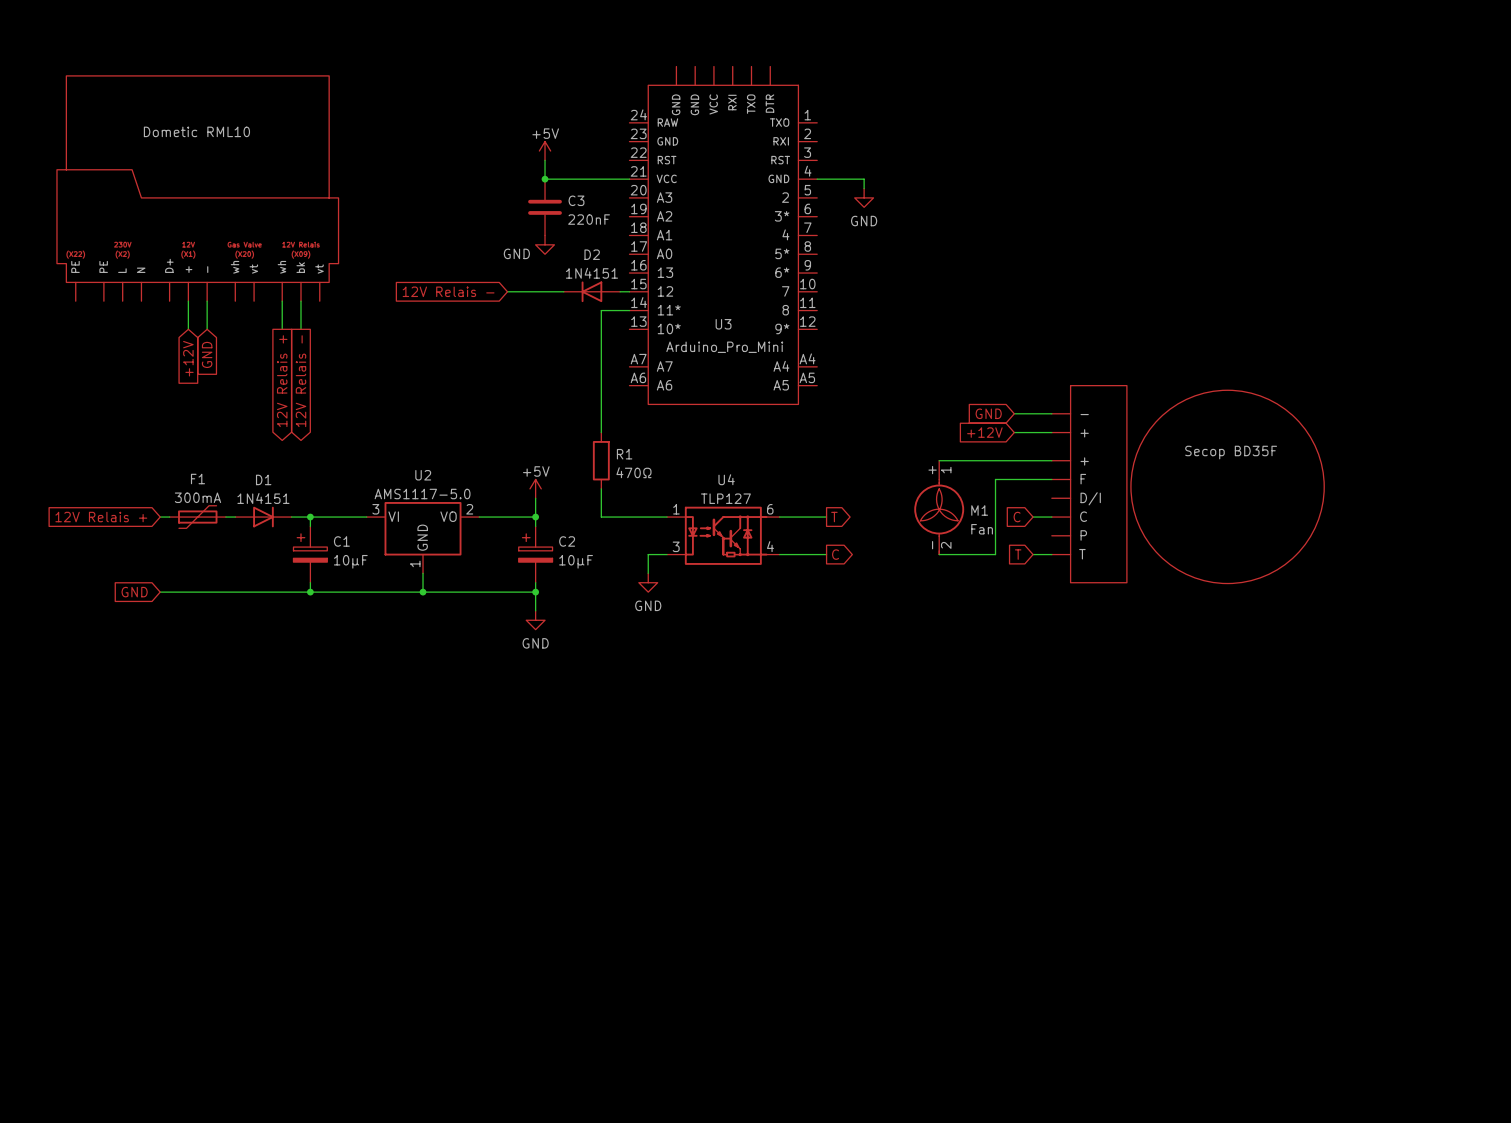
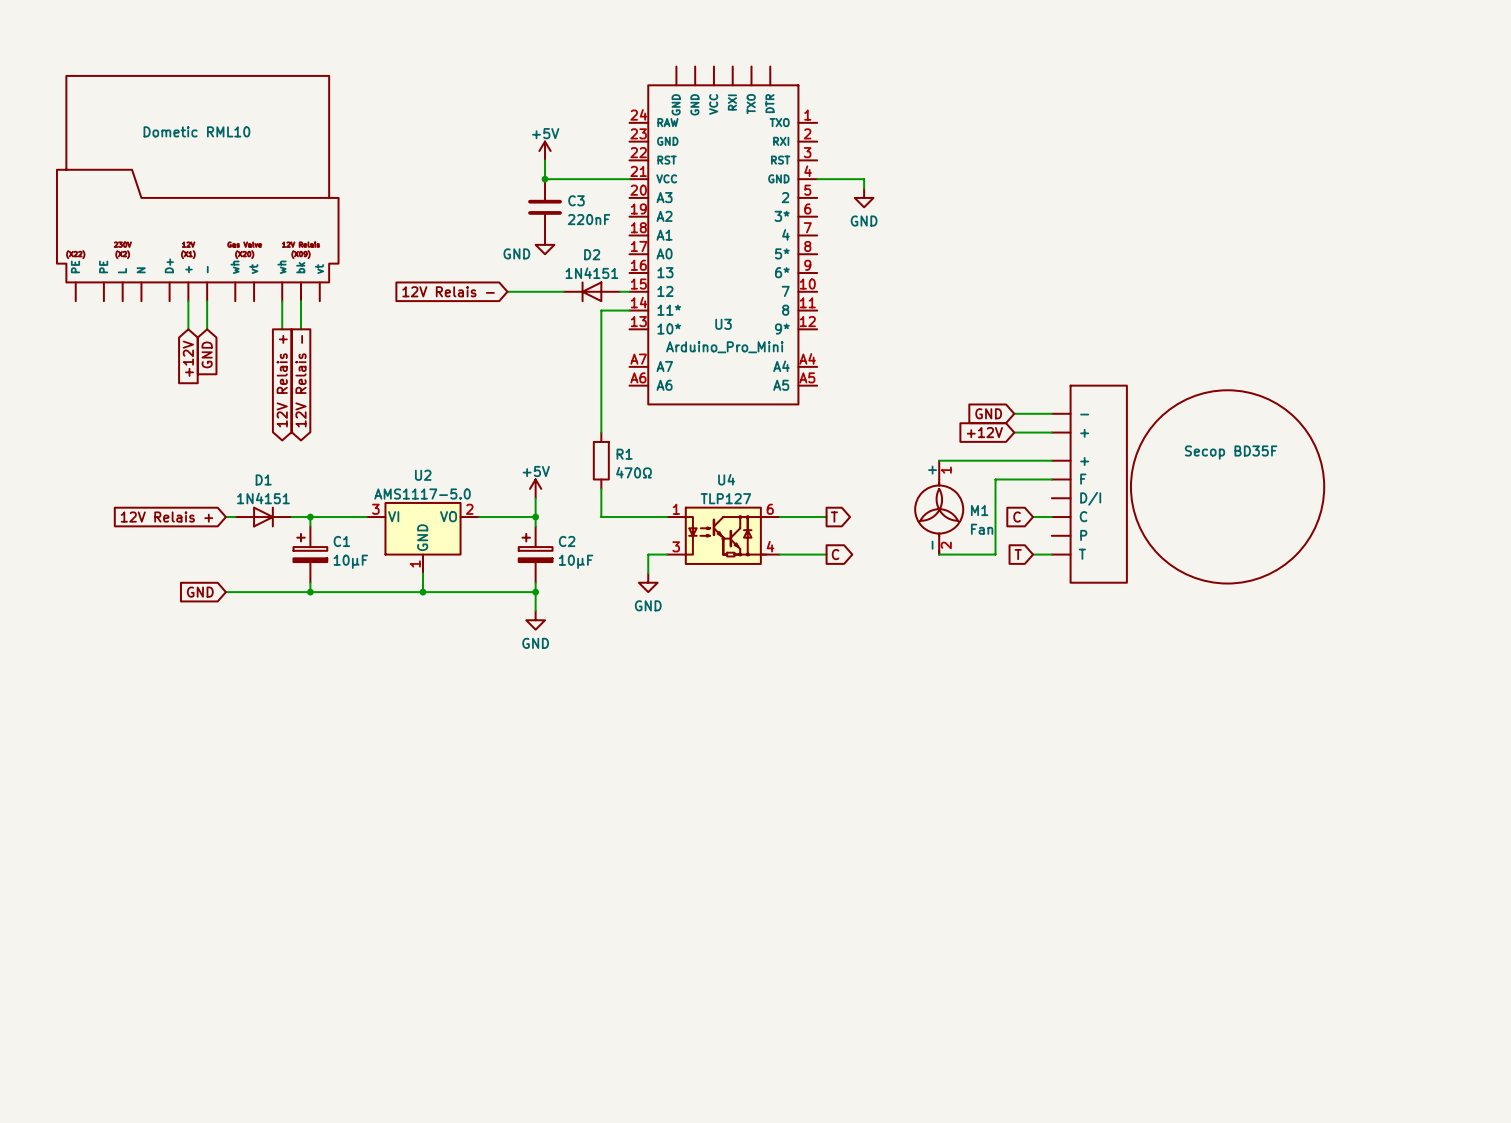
global label position: 12V Relais + (101, 517) -> 12V Relais + (167, 517)
wire: (160, 517) (169, 517) -> none
F1: 300mA (197, 517) -> none
global label position: GND (134, 592) -> GND (200, 592)
wire: (160, 592) (225, 592) -> none

